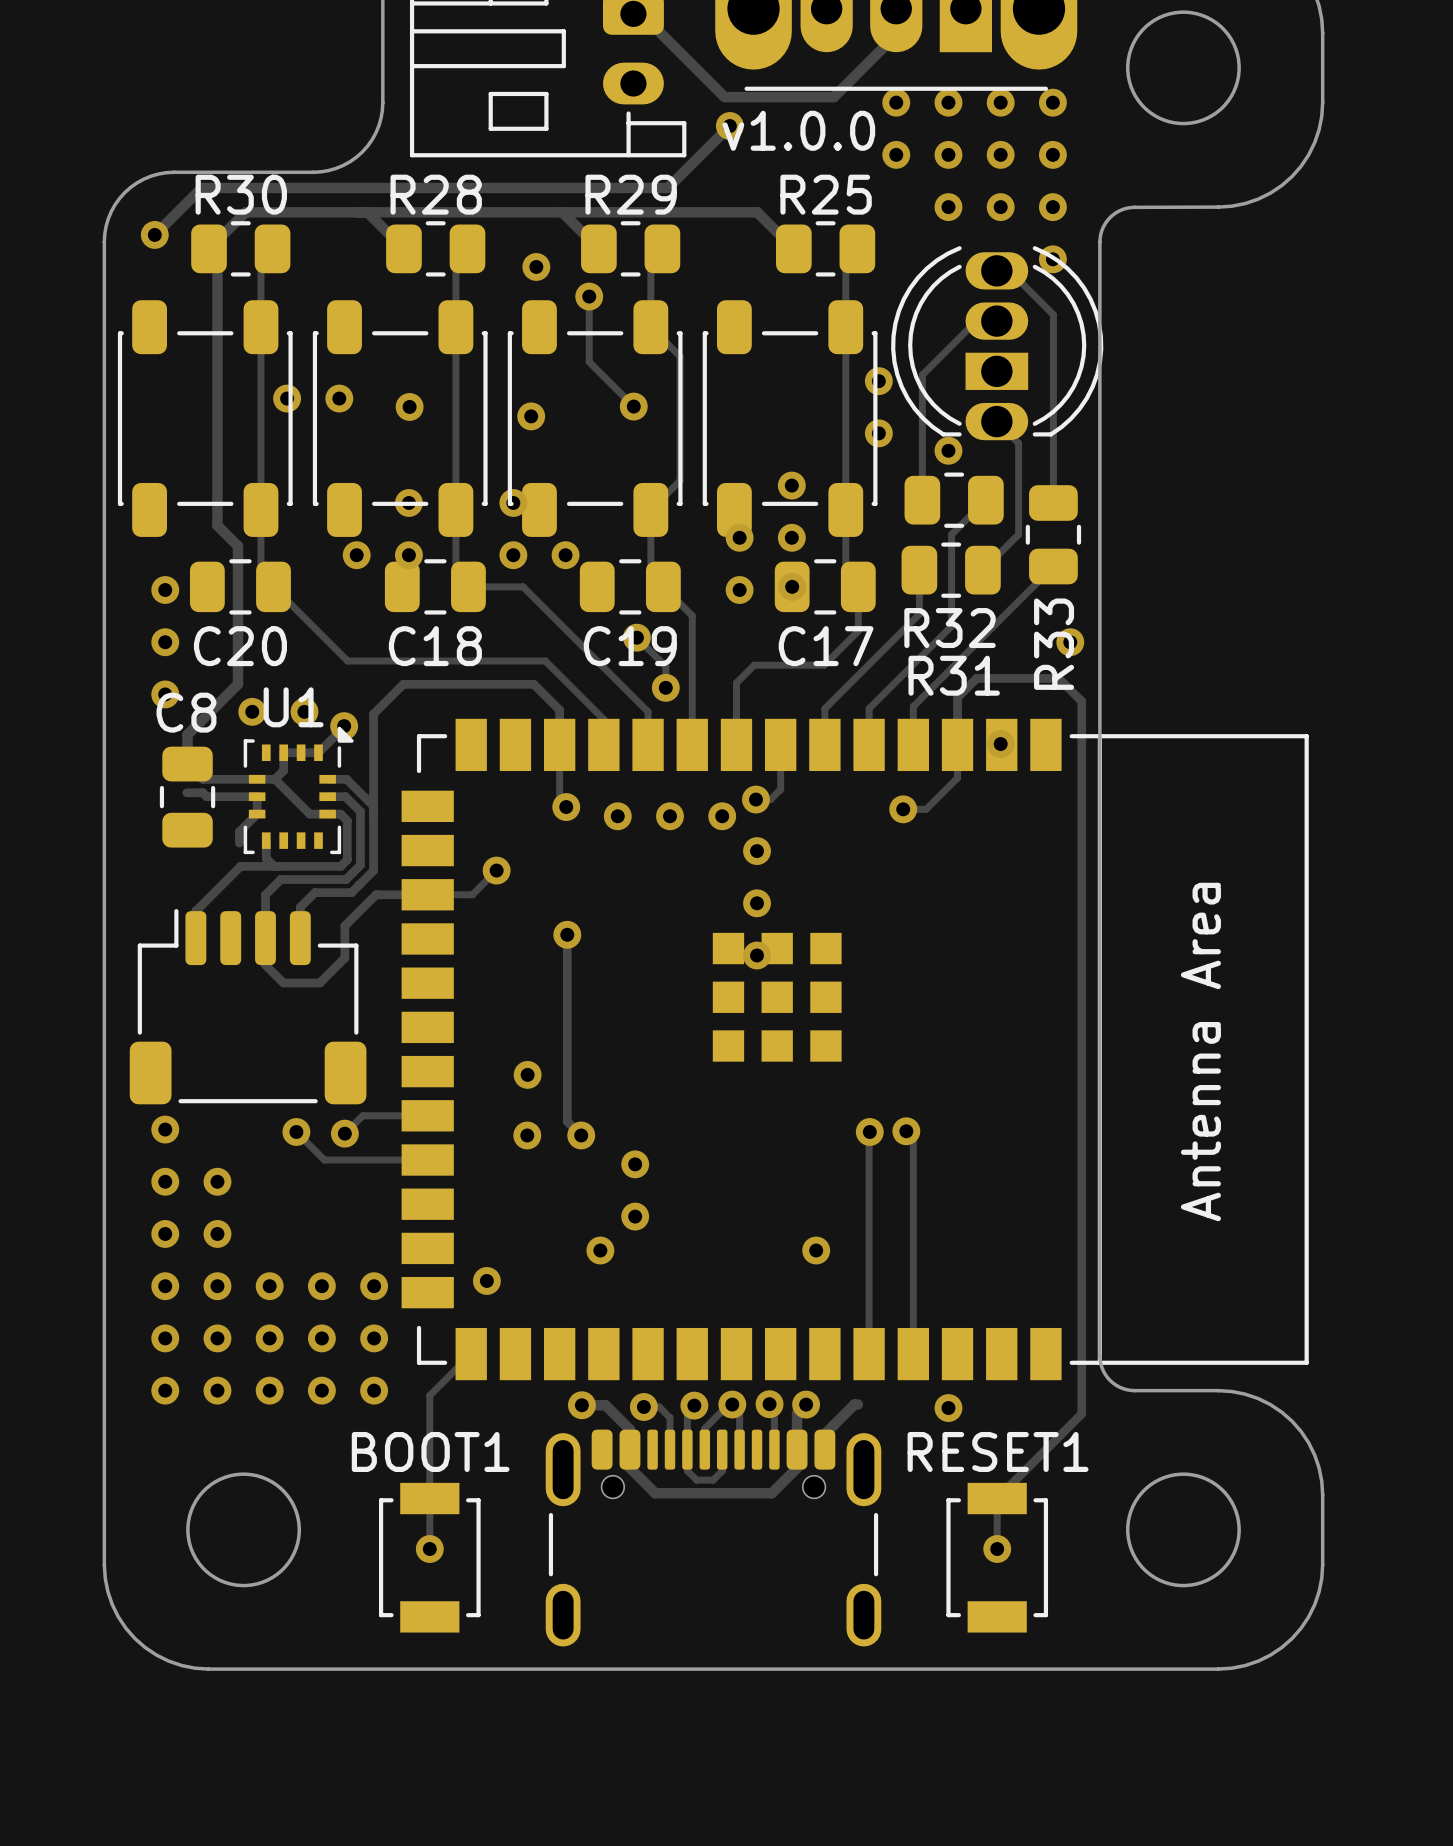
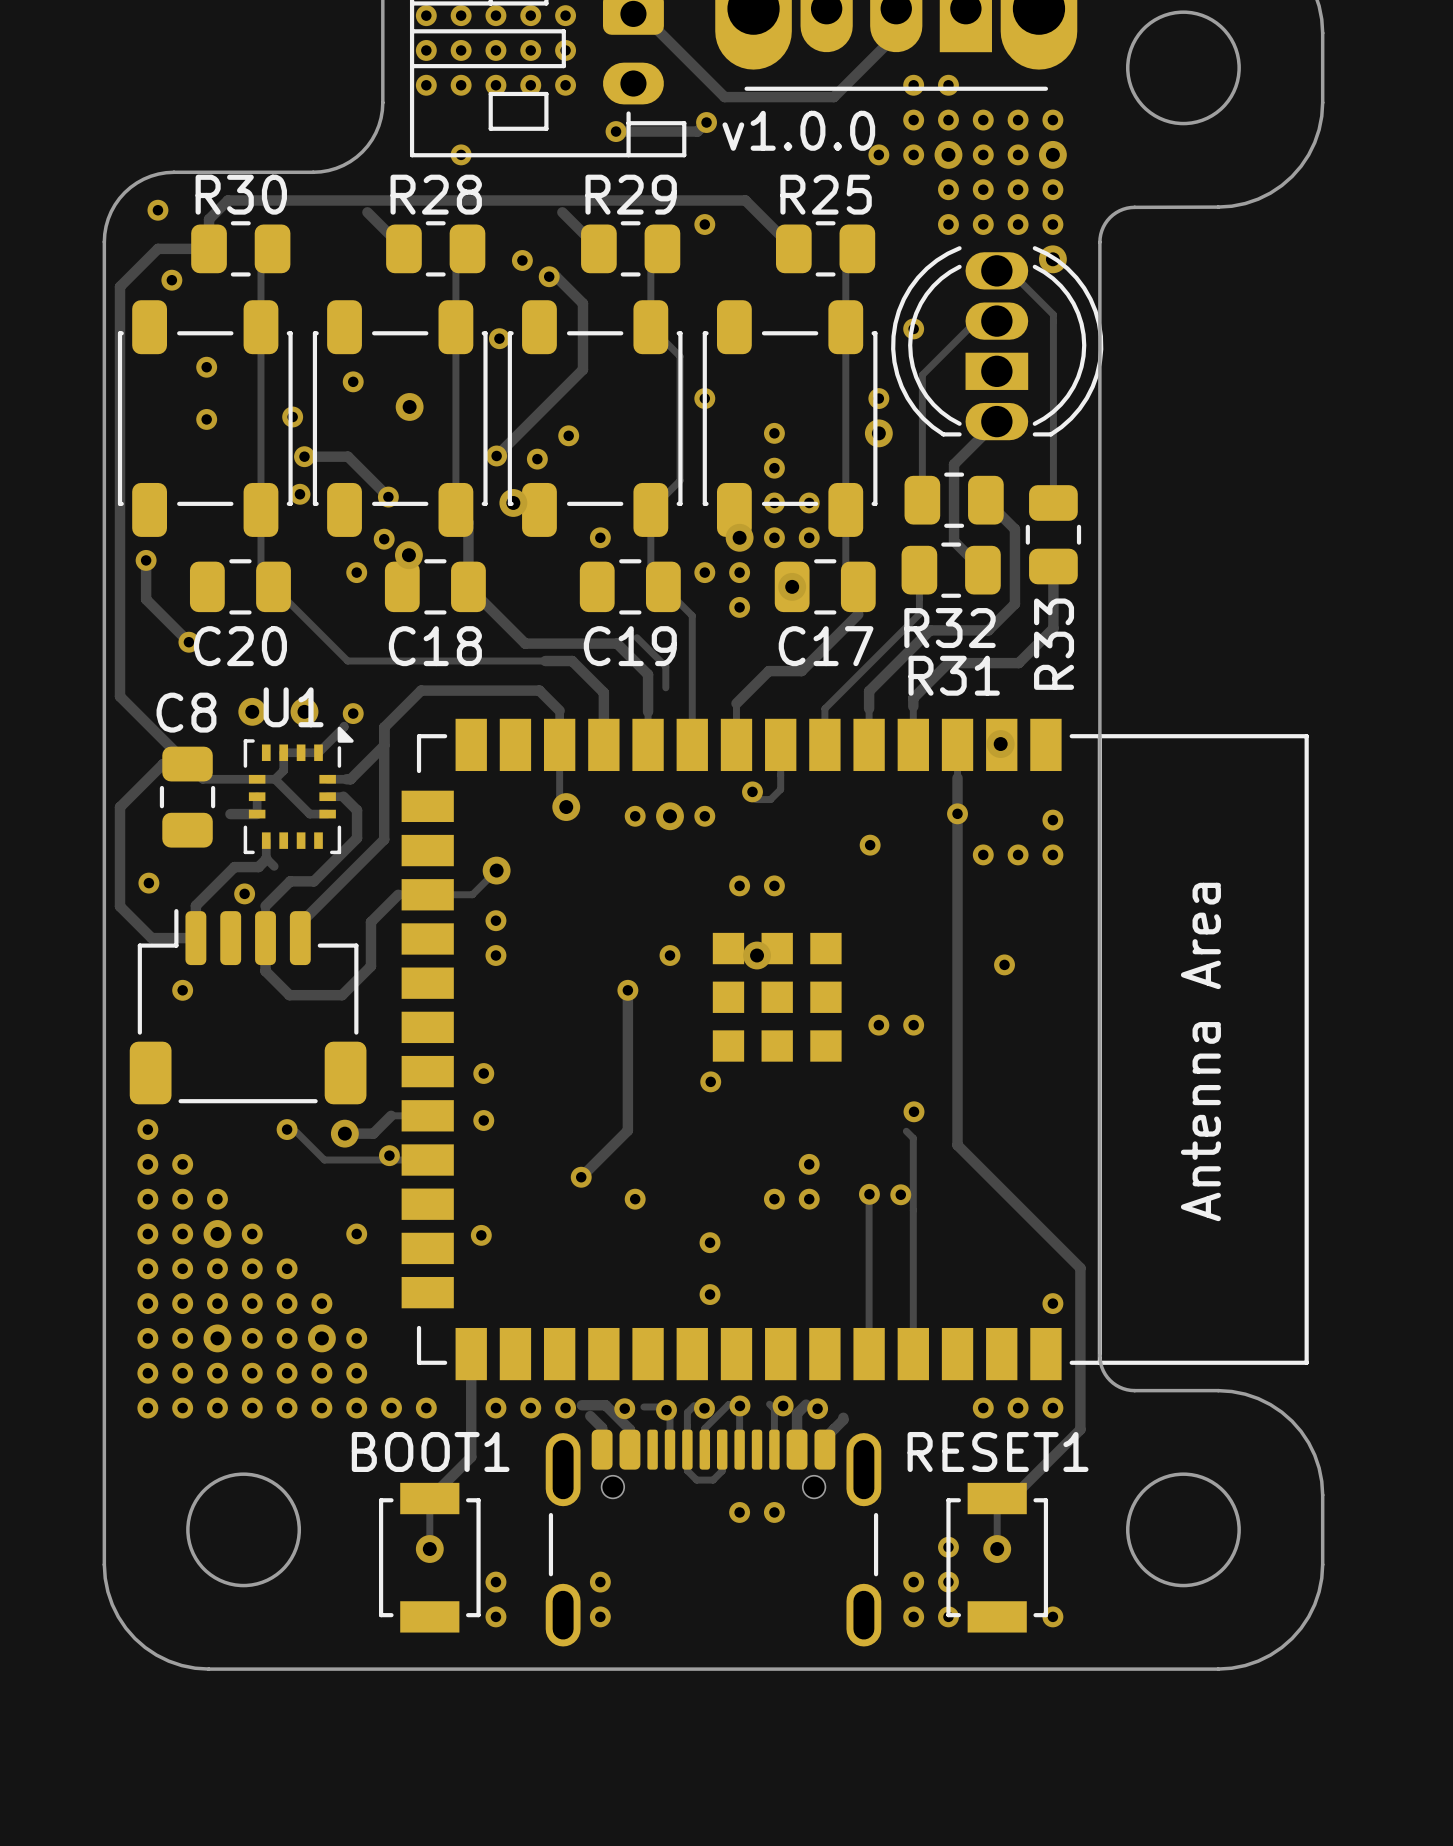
via: none -> (426, 15)
via: none -> (461, 15)
via: none -> (495, 15)
via: none -> (530, 15)
via: none -> (565, 15)
via: none -> (426, 50)
via: none -> (461, 50)
via: none -> (495, 50)
via: none -> (530, 50)
via: none -> (565, 50)
via: none -> (426, 85)
via: none -> (461, 85)
via: none -> (495, 85)
via: none -> (530, 85)
via: none -> (565, 85)
via: none -> (913, 85)
via: none -> (948, 85)
via: (896, 102) -> none
via: (948, 102) -> none
via: (1000, 102) -> none
via position: (1052, 102) -> (1052, 120)
via: none -> (913, 120)
via: none -> (948, 120)
via: none -> (983, 120)
via: none -> (1018, 120)
track: none -> (706, 122) (697, 131) (616, 131)
track: (729, 125) (667, 187) (201, 187) (154, 234) -> none
via position: (729, 125) -> (706, 122)
via: none -> (616, 131)
via: none -> (461, 154)
via: none -> (878, 154)
via: (896, 154) -> none
via: none -> (913, 154)
via: none -> (983, 154)
via: (1000, 154) -> none
via: none -> (1018, 154)
via: none -> (948, 189)
via: none -> (983, 189)
via: none -> (1018, 189)
via: none -> (1052, 189)
via: (948, 207) -> none
via: (1000, 207) -> none
via: (1052, 207) -> none
via: none -> (157, 210)
track: (757, 212) (245, 212) (209, 248) (217, 257) (217, 525) (238, 546) (238, 684) (187, 734) (187, 764) -> (757, 212) (745, 200) (227, 200) (209, 219) (209, 248) (157, 248) (120, 286) (120, 696) (187, 764) (163, 764) (120, 807) (120, 906) (151, 938) (195, 938)
via: none -> (704, 224)
via: none -> (948, 224)
via: none -> (983, 224)
via: none -> (1018, 224)
via: none -> (1052, 224)
via: (154, 234) -> none
via: none -> (522, 260)
via: (536, 266) -> none
track: none -> (549, 276) (556, 276) (582, 303) (582, 369) (496, 455)
via: none -> (549, 276)
via: none -> (171, 280)
track: (589, 296) (589, 362) (633, 406) -> none
via: (589, 296) -> none
via: none -> (913, 328)
via: none -> (499, 338)
via: none -> (206, 367)
via position: (878, 381) -> (878, 398)
via position: (287, 398) -> (292, 417)
via position: (339, 398) -> (353, 381)
via: none -> (704, 398)
via: (633, 406) -> none
via: (531, 416) -> none
via: none -> (206, 419)
track: (996, 421) (1018, 443) (1018, 534) (982, 570) -> (996, 421) (954, 464) (954, 541) (982, 570)
via: none -> (774, 433)
via: none -> (568, 435)
via: (948, 450) -> none
via: none -> (496, 455)
track: none -> (304, 456) (348, 456) (388, 497)
via: none -> (304, 456)
via: none -> (537, 459)
via: none -> (774, 468)
via: (791, 485) -> none
via: none -> (299, 494)
track: (985, 500) (951, 534) (951, 626) (869, 708) -> (985, 500) (1014, 529) (1014, 603) (988, 630) (930, 630) (869, 691) (869, 708)
via position: (408, 502) -> (388, 497)
via: none -> (774, 502)
via: none -> (809, 502)
track: (455, 509) (455, 574) (468, 586) (523, 586) (648, 711) -> (455, 509) (468, 522) (468, 586) (525, 643) (617, 643) (648, 674) (648, 711)
via: none -> (600, 537)
via: none -> (774, 537)
via: (791, 537) -> none
via: none -> (809, 537)
via: none -> (384, 539)
via position: (356, 555) -> (356, 572)
via: (513, 555) -> none
via: (565, 555) -> none
track: none -> (146, 560) (146, 599) (188, 642)
via: none -> (146, 560)
track: (1053, 566) (913, 706) -> (1053, 566) (1053, 628) (1018, 663) (948, 663) (913, 698) (913, 706)
via: none -> (704, 572)
via: none -> (739, 572)
via: (165, 590) -> none
via: (739, 590) -> none
via: none -> (739, 607)
track: (858, 614) (858, 631) (824, 665) (754, 665) (736, 682) (736, 703) -> (858, 614) (801, 671) (768, 671) (736, 703)
via: (636, 637) -> none
via position: (165, 642) -> (188, 642)
via: (1070, 642) -> none
track: (545, 661) (603, 719) -> (545, 661) (572, 661) (603, 692) (603, 719)
via: (665, 687) -> none
via: (165, 694) -> none
track: (559, 710) (533, 684) (403, 684) (373, 714) (373, 870) (351, 892) (314, 892) (300, 907) (300, 922) -> (559, 710) (539, 690) (421, 690) (384, 727) (384, 839) (300, 922)
via position: (344, 726) -> (353, 713)
track: (957, 744) (957, 697) (976, 678) (1058, 678) (1081, 701) (1081, 1413) (997, 1498) -> (957, 777) (957, 1145) (1080, 1268) (1080, 1429) (1011, 1498) (997, 1498)
track: (957, 777) (926, 809) (903, 809) -> none
track: (346, 779) (373, 806) -> (346, 779) (350, 779) (384, 745)
via size: [742, 785, 770, 814] -> [742, 781, 763, 803]
track: (186, 792) (202, 792) (206, 796) (257, 796) -> none
track: (343, 796) (360, 811) (360, 865) (346, 879) (280, 879) (265, 894) (265, 906) -> (343, 796) (357, 810) (357, 838) (313, 881) (290, 881) (265, 906)
via: (903, 809) -> none
via: none -> (957, 813)
track: (257, 814) (239, 831) (239, 843) -> (257, 814) (230, 814)
track: (327, 814) (340, 814) (347, 820) (347, 859) (340, 866) (240, 866) (195, 911) -> (266, 858) (258, 867) (234, 867) (195, 905) (195, 911)
via position: (617, 816) -> (635, 816)
via position: (722, 816) -> (704, 816)
via: none -> (1052, 820)
via: none -> (870, 845)
via: (757, 851) -> none
via: none -> (983, 854)
via: none -> (1018, 854)
via: none -> (1052, 854)
via: none -> (148, 883)
via: none -> (739, 885)
via: none -> (774, 885)
via: none -> (244, 893)
track: (398, 894) (376, 894) (344, 925) (344, 957) (319, 983) (283, 983) (265, 965) -> (398, 894) (370, 922) (370, 966) (342, 995) (289, 995) (265, 971) (265, 965)
via: (757, 903) -> none
via: none -> (495, 920)
track: (567, 934) (567, 1121) (581, 1135) -> none
via: (567, 934) -> none
via: none -> (495, 955)
via: none -> (669, 955)
via: none -> (1004, 964)
via: none -> (182, 990)
track: none -> (627, 990) (627, 1130) (581, 1177)
via: none -> (627, 990)
via: none -> (878, 1025)
via: none -> (913, 1025)
via: none -> (483, 1073)
via: (527, 1074) -> none
via: none -> (710, 1081)
track: (391, 1115) (362, 1115) (344, 1133) -> (391, 1115) (373, 1133) (344, 1133)
via size: [282, 1118, 311, 1146] -> [276, 1119, 298, 1140]
via: none -> (483, 1120)
via position: (165, 1129) -> (147, 1129)
track: (869, 1131) (869, 1194) -> none
via: (869, 1131) -> none
via position: (906, 1131) -> (914, 1111)
via: (527, 1135) -> none
via: (581, 1135) -> none
via: none -> (389, 1155)
via: none -> (147, 1164)
via: none -> (182, 1164)
via: (635, 1164) -> none
via: none -> (809, 1164)
via: none -> (581, 1177)
via: (165, 1181) -> none
via position: (217, 1181) -> (217, 1199)
via: none -> (869, 1194)
via: none -> (900, 1194)
via: none -> (147, 1199)
via: none -> (182, 1199)
via: none -> (774, 1199)
via: none -> (809, 1199)
via position: (635, 1216) -> (635, 1199)
via: none -> (147, 1233)
via: (165, 1233) -> none
via: none -> (182, 1233)
via: none -> (252, 1233)
via: none -> (356, 1233)
via: none -> (481, 1235)
via: none -> (710, 1242)
via: (600, 1250) -> none
via: (816, 1250) -> none
via: none -> (147, 1268)
via: none -> (182, 1268)
via: none -> (217, 1268)
via: none -> (252, 1268)
via: none -> (287, 1268)
via: (486, 1280) -> none
via: (165, 1286) -> none
via: (217, 1286) -> none
via: (269, 1286) -> none
via position: (321, 1286) -> (321, 1303)
via: (374, 1286) -> none
via: none -> (710, 1294)
via: none -> (147, 1303)
via: none -> (182, 1303)
via: none -> (217, 1303)
via: none -> (252, 1303)
via: none -> (287, 1303)
via: none -> (1052, 1303)
via: none -> (147, 1338)
via: (165, 1338) -> none
via: none -> (182, 1338)
via: none -> (252, 1338)
via: (269, 1338) -> none
via: none -> (287, 1338)
via position: (374, 1338) -> (356, 1338)
track: (471, 1354) (429, 1395) (429, 1498) -> (471, 1354) (471, 1457) (429, 1498)
via: none -> (147, 1373)
via: none -> (182, 1373)
via: none -> (217, 1373)
via: none -> (252, 1373)
via: none -> (287, 1373)
via: none -> (321, 1373)
via: none -> (356, 1373)
via: (165, 1390) -> none
via: (217, 1390) -> none
via: (269, 1390) -> none
via: (321, 1390) -> none
via: (374, 1390) -> none
via size: [718, 1390, 747, 1419] -> [729, 1395, 751, 1417]
via size: [680, 1391, 709, 1420] -> [694, 1397, 715, 1419]
via: (769, 1404) -> none
via: (806, 1404) -> none
track: (857, 1404) (854, 1404) (824, 1434) (824, 1438) -> (843, 1417) (824, 1438)
via position: (581, 1405) -> (565, 1408)
via: none -> (783, 1405)
via: (643, 1406) -> none
via: none -> (147, 1408)
via: none -> (182, 1408)
via: none -> (217, 1408)
via: none -> (252, 1408)
via: none -> (287, 1408)
via: none -> (321, 1408)
via: none -> (356, 1408)
via: none -> (391, 1408)
via: none -> (426, 1408)
via: none -> (495, 1408)
via: none -> (530, 1408)
via: none -> (624, 1408)
via: none -> (817, 1408)
via: (948, 1408) -> none
via: none -> (983, 1408)
via: none -> (1018, 1408)
via: none -> (1052, 1408)
via: none -> (666, 1410)
track: none -> (590, 1416) (602, 1427) (602, 1449)
track: (629, 1449) (629, 1468) (655, 1493) (771, 1493) (797, 1468) (797, 1449) -> none
via: none -> (739, 1512)
via: none -> (774, 1512)
via: none -> (948, 1547)
via: none -> (495, 1582)
via: none -> (600, 1582)
via: none -> (913, 1582)
via: none -> (948, 1582)
via: none -> (495, 1616)
via: none -> (600, 1616)
via: none -> (913, 1616)
via: none -> (948, 1616)
via: none -> (1052, 1616)

